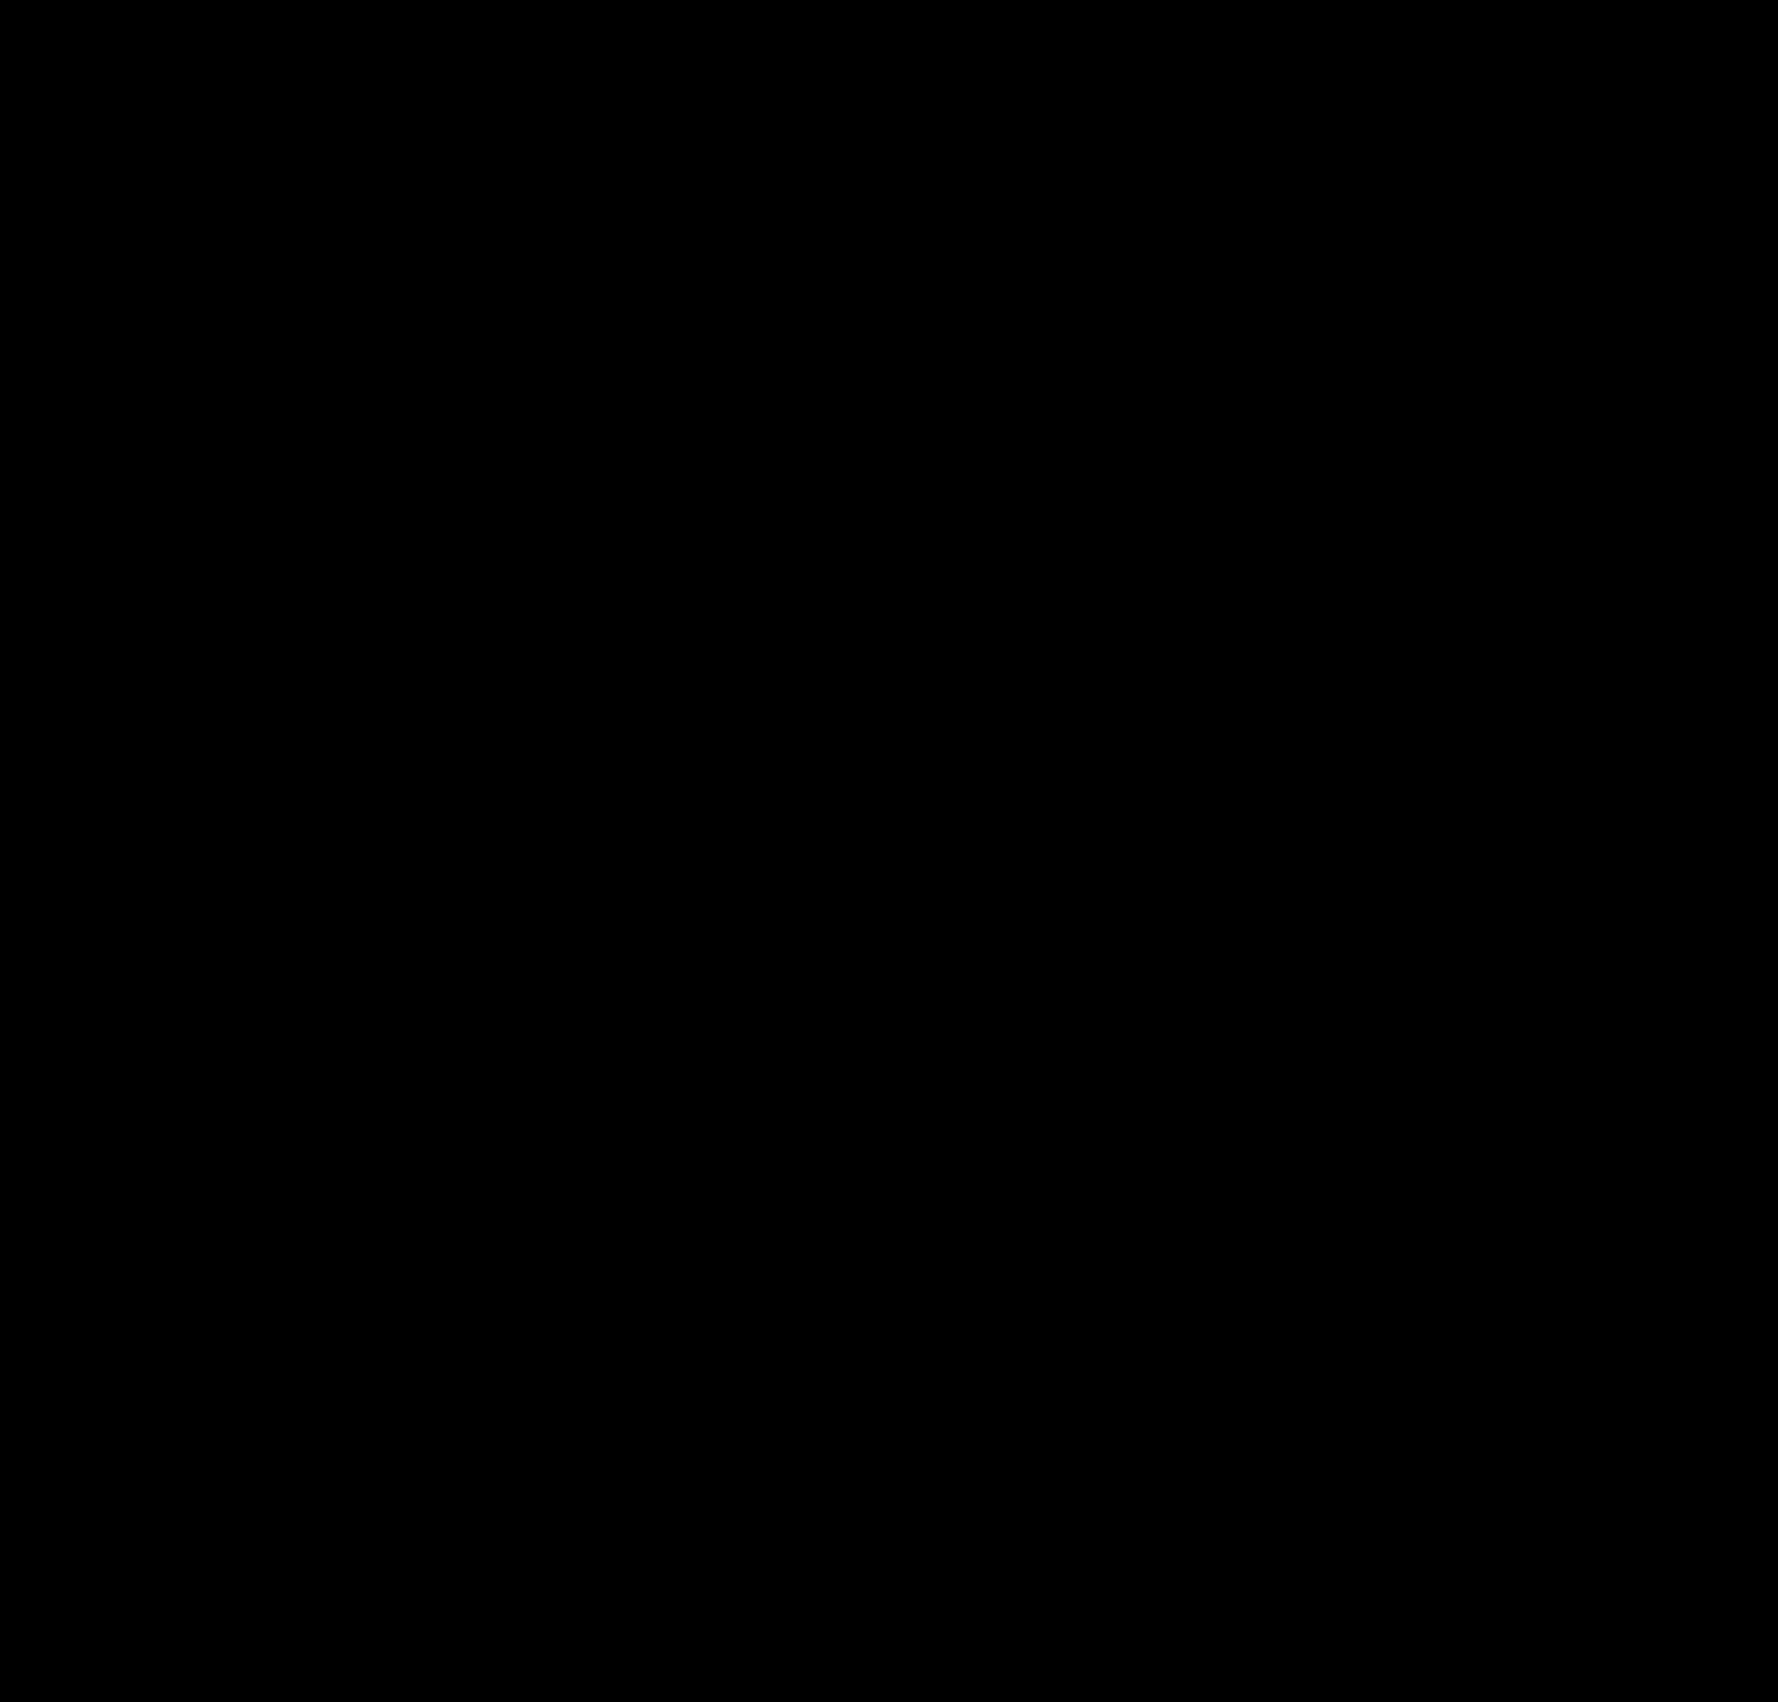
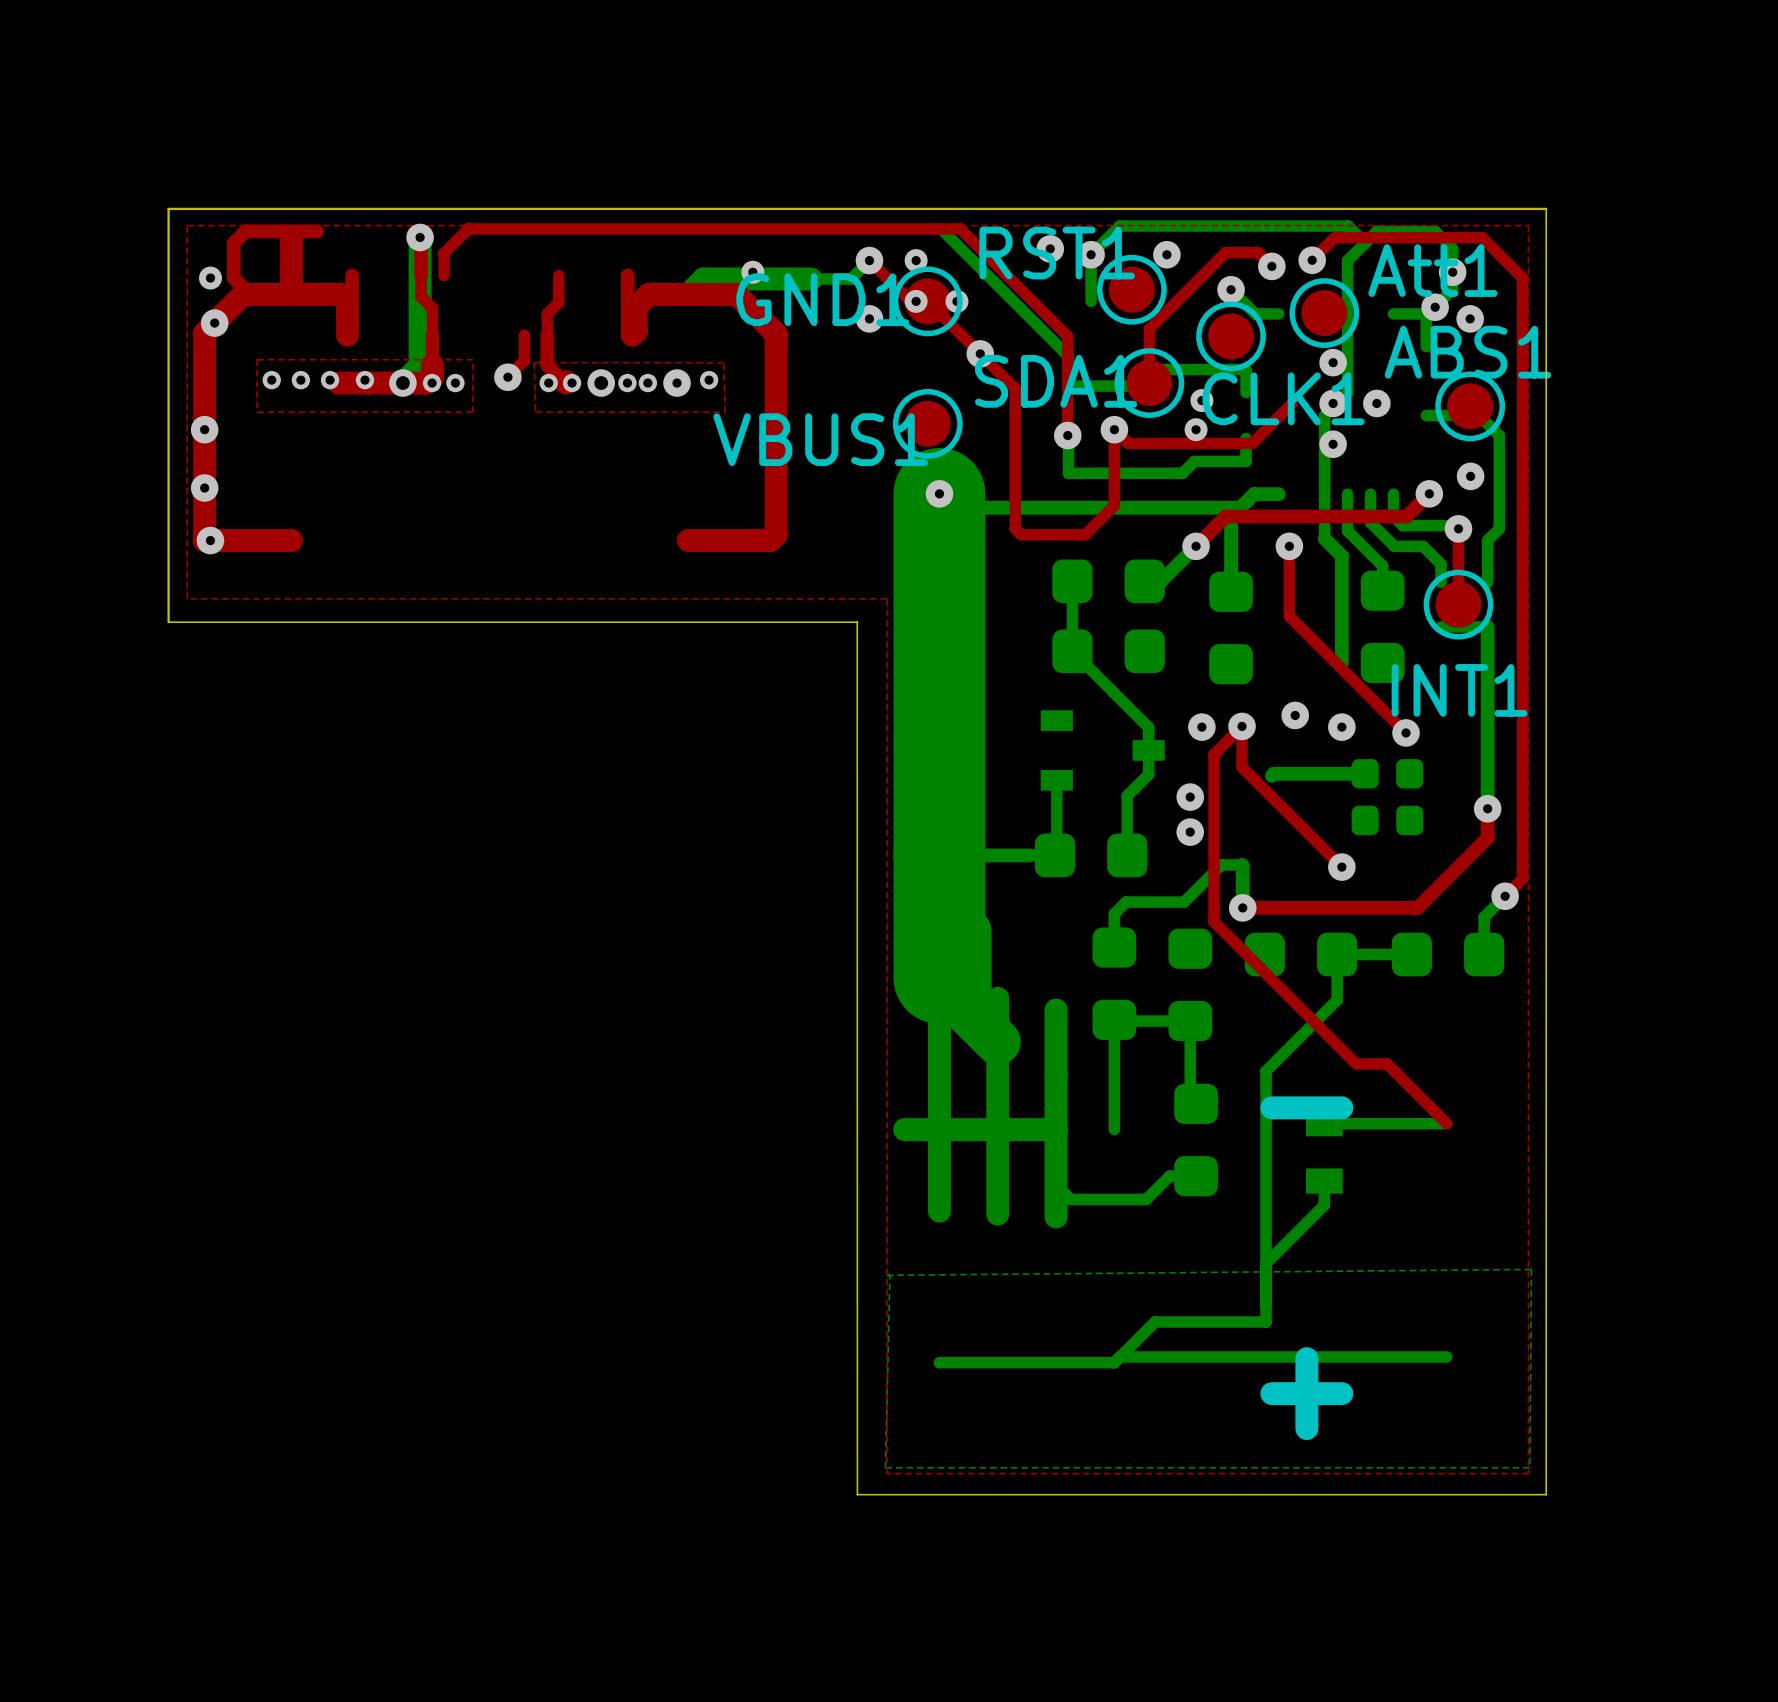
top zone outline: none -> (187, 225) (1528, 225) (1528, 1473) (886, 1473) (886, 598) (187, 598) (187, 225)
bottom track: none -> (941, 228) (1068, 356) (1068, 386) (1134, 386) (1151, 369) (1246, 369) (1246, 392)
top track: none -> (317, 231) (245, 231) (233, 243) (233, 278) (251, 295)
top track: none -> (291, 237) (291, 294)
top track: none -> (420, 237) (421, 296) (432, 308) (432, 376) (426, 383) (338, 383)
bottom track: none -> (420, 237) (420, 365) (402, 383)
via: none -> (420, 237)
bottom track: none -> (1365, 243) (1348, 226) (1119, 226) (1091, 254) (1091, 301)
via: none -> (1050, 248)
via: none -> (1091, 254)
via: none -> (1166, 254)
top track: none -> (869, 260) (910, 301) (927, 301) (1015, 388) (1015, 528) (1021, 534) (1085, 534) (1114, 505) (1114, 429) (1128, 443) (1252, 443) (1292, 403)
bottom track: none -> (869, 260) (851, 278) (703, 278) (688, 294)
via: none -> (869, 260)
via: none -> (916, 260)
top track: none -> (1312, 260) (1334, 237) (1482, 237) (1522, 278) (1522, 878) (1505, 896)
via: none -> (1312, 260)
top track: none -> (1271, 266) (1258, 252) (1225, 252) (1149, 328) (1149, 383)
via: none -> (1271, 266)
via: none -> (752, 272)
via: none -> (1452, 272)
top track: none -> (352, 275) (352, 330) (347, 335) (347, 302) (339, 294) (243, 294) (204, 333) (204, 540) (291, 540)
top track: none -> (444, 275) (444, 253) (468, 228) (960, 228) (1067, 336) (1067, 435)
top track: none -> (558, 275) (558, 302) (547, 313) (547, 365) (565, 383) (566, 381)
top track: none -> (627, 275) (627, 330) (632, 335) (636, 331) (636, 307) (649, 294) (736, 294) (776, 334) (776, 534) (770, 540) (688, 540)
via: none -> (210, 278)
RST1: none -> (1131, 289)
bottom track: none -> (1231, 289) (1255, 313) (1278, 313)
via: none -> (1231, 289)
via: none -> (916, 301)
GND1: none -> (927, 301)
via: none -> (956, 301)
via: none -> (1435, 307)
Att1: none -> (1324, 313)
bottom track: none -> (1393, 313) (1424, 313) (1426, 315)
bottom track: none -> (1426, 315) (1426, 346)
bottom track: none -> (1426, 315) (1452, 289) (1452, 248) (1435, 231) (1376, 231) (1347, 260) (1347, 392) (1324, 415) (1324, 538) (1341, 555) (1341, 662)
via: none -> (869, 318)
via: none -> (1470, 318)
via: none -> (214, 323)
top track: none -> (524, 335) (524, 360) (507, 377)
CLK1: none -> (1231, 336)
via: none -> (980, 353)
top zone outline: none -> (257, 359) (472, 359) (472, 412) (257, 412) (257, 359)
top zone outline: none -> (534, 362) (723, 362) (725, 412) (535, 412) (534, 362)
via: none -> (1333, 362)
via: none -> (507, 377)
via: none -> (271, 380)
via: none -> (300, 380)
via: none -> (330, 380)
via: none -> (365, 380)
via: none -> (709, 380)
via: none -> (402, 383)
via: none -> (432, 383)
via: none -> (455, 383)
via: none -> (548, 383)
via: none -> (572, 383)
via: none -> (601, 383)
via: none -> (627, 383)
via: none -> (647, 383)
via: none -> (677, 383)
SDA1: none -> (1149, 383)
via: none -> (1201, 400)
via: none -> (1333, 403)
via: none -> (1376, 403)
ABS1: none -> (1470, 406)
bottom track: none -> (1426, 415) (1479, 415) (1499, 435) (1499, 528) (1487, 540) (1487, 582)
VBUS1: none -> (927, 423)
via: none -> (204, 429)
via: none -> (1114, 429)
via: none -> (1196, 429)
bottom track: none -> (1067, 435) (1068, 473) (1182, 473) (1194, 461) (1246, 461) (1246, 438)
via: none -> (1067, 435)
via: none -> (1333, 444)
via: none -> (1470, 476)
via: none -> (204, 488)
bottom track: none -> (939, 493) (939, 1211)
via: none -> (939, 493)
top track: none -> (1429, 493) (1406, 516) (1225, 516) (1196, 546)
via: none -> (1429, 493)
bottom track: none -> (1278, 494) (1254, 494) (1240, 507) (953, 507)
bottom track: none -> (1347, 494) (1347, 530) (1382, 565) (1382, 590)
bottom track: none -> (1370, 494) (1370, 522) (1394, 546) (1423, 546) (1441, 564) (1441, 582)
bottom track: none -> (1393, 494) (1393, 516) (1402, 525) (1455, 525) (1458, 528)
bottom track: none -> (1227, 507) (1231, 511) (1231, 591)
top track: none -> (1458, 528) (1458, 604)
via: none -> (1458, 528)
via: none -> (210, 540)
bottom track: none -> (1196, 546) (1161, 581) (1143, 580)
via: none -> (1196, 546)
top track: none -> (1289, 546) (1289, 616) (1406, 732)
via: none -> (1289, 546)
bottom track: none -> (1072, 581) (1072, 651) (1148, 727) (1148, 774) (1127, 795) (1127, 855)
part: none -> (1108, 581)
INT1: none -> (1458, 604)
board edge: none -> (857, 622) (857, 1494) (1546, 1494) (1546, 208) (168, 208) (168, 622) (857, 622)
part: none -> (1382, 626)
bottom track: none -> (1441, 626) (1487, 626) (1487, 808)
part: none -> (1231, 627)
part: none -> (1108, 651)
via: none -> (1295, 715)
via: none -> (1242, 726)
via: none -> (1201, 727)
via: none -> (1341, 727)
via: none -> (1406, 732)
part: none -> (1102, 750)
bottom track: none -> (1365, 773) (1273, 773) (1271, 775)
part: none -> (1387, 773)
bottom track: none -> (1056, 780) (1056, 853) (1054, 855) (939, 855)
via: none -> (1190, 797)
top track: none -> (1487, 808) (1487, 837) (1417, 907) (1242, 907)
via: none -> (1487, 808)
part: none -> (1387, 820)
via: none -> (1190, 832)
part: none -> (1091, 855)
top track: none -> (1341, 867) (1242, 767) (1242, 726) (1214, 754) (1214, 921) (1356, 1063) (1387, 1063) (1446, 1123)
via: none -> (1341, 867)
bottom track: none -> (968, 893) (968, 1012) (997, 1042) (997, 1129)
bottom track: none -> (1505, 896) (1484, 917) (1484, 954)
via: none -> (1505, 896)
bottom track: none -> (1242, 907) (1242, 865) (1221, 864) (1184, 902) (1126, 902) (1114, 913) (1114, 947)
via: none -> (1242, 907)
part: none -> (1301, 954)
bottom track: none -> (1411, 954) (1337, 954) (1337, 1000) (1266, 1071) (1266, 1321) (1155, 1321) (1114, 1362) (939, 1362)
part: none -> (1448, 954)
part: none -> (1114, 983)
part: none -> (1190, 984)
bottom track: none -> (997, 998) (997, 1214)
bottom track: none -> (1056, 1009) (1056, 1216)
bottom track: none -> (1190, 1021) (1114, 1019) (1114, 1129)
bottom track: none -> (1190, 1021) (1190, 1098) (1196, 1103)
text: none -> - (1306, 1107)
bottom track: none -> (1324, 1123) (1446, 1123)
bottom track: none -> (904, 1129) (1056, 1129)
bottom track: none -> (1056, 1129) (1056, 1184) (1070, 1199) (1146, 1199) (1169, 1176) (1196, 1176)
part: none -> (1196, 1140)
part: none -> (1324, 1152)
bottom track: none -> (1324, 1181) (1324, 1205) (1266, 1263)
bottom zone outline: none -> (1531, 1269) (1529, 1467) (885, 1467) (889, 1275) (886, 1275) (1531, 1269)
bottom track: none -> (1120, 1356) (1446, 1356)
text: none -> + (1306, 1393)

